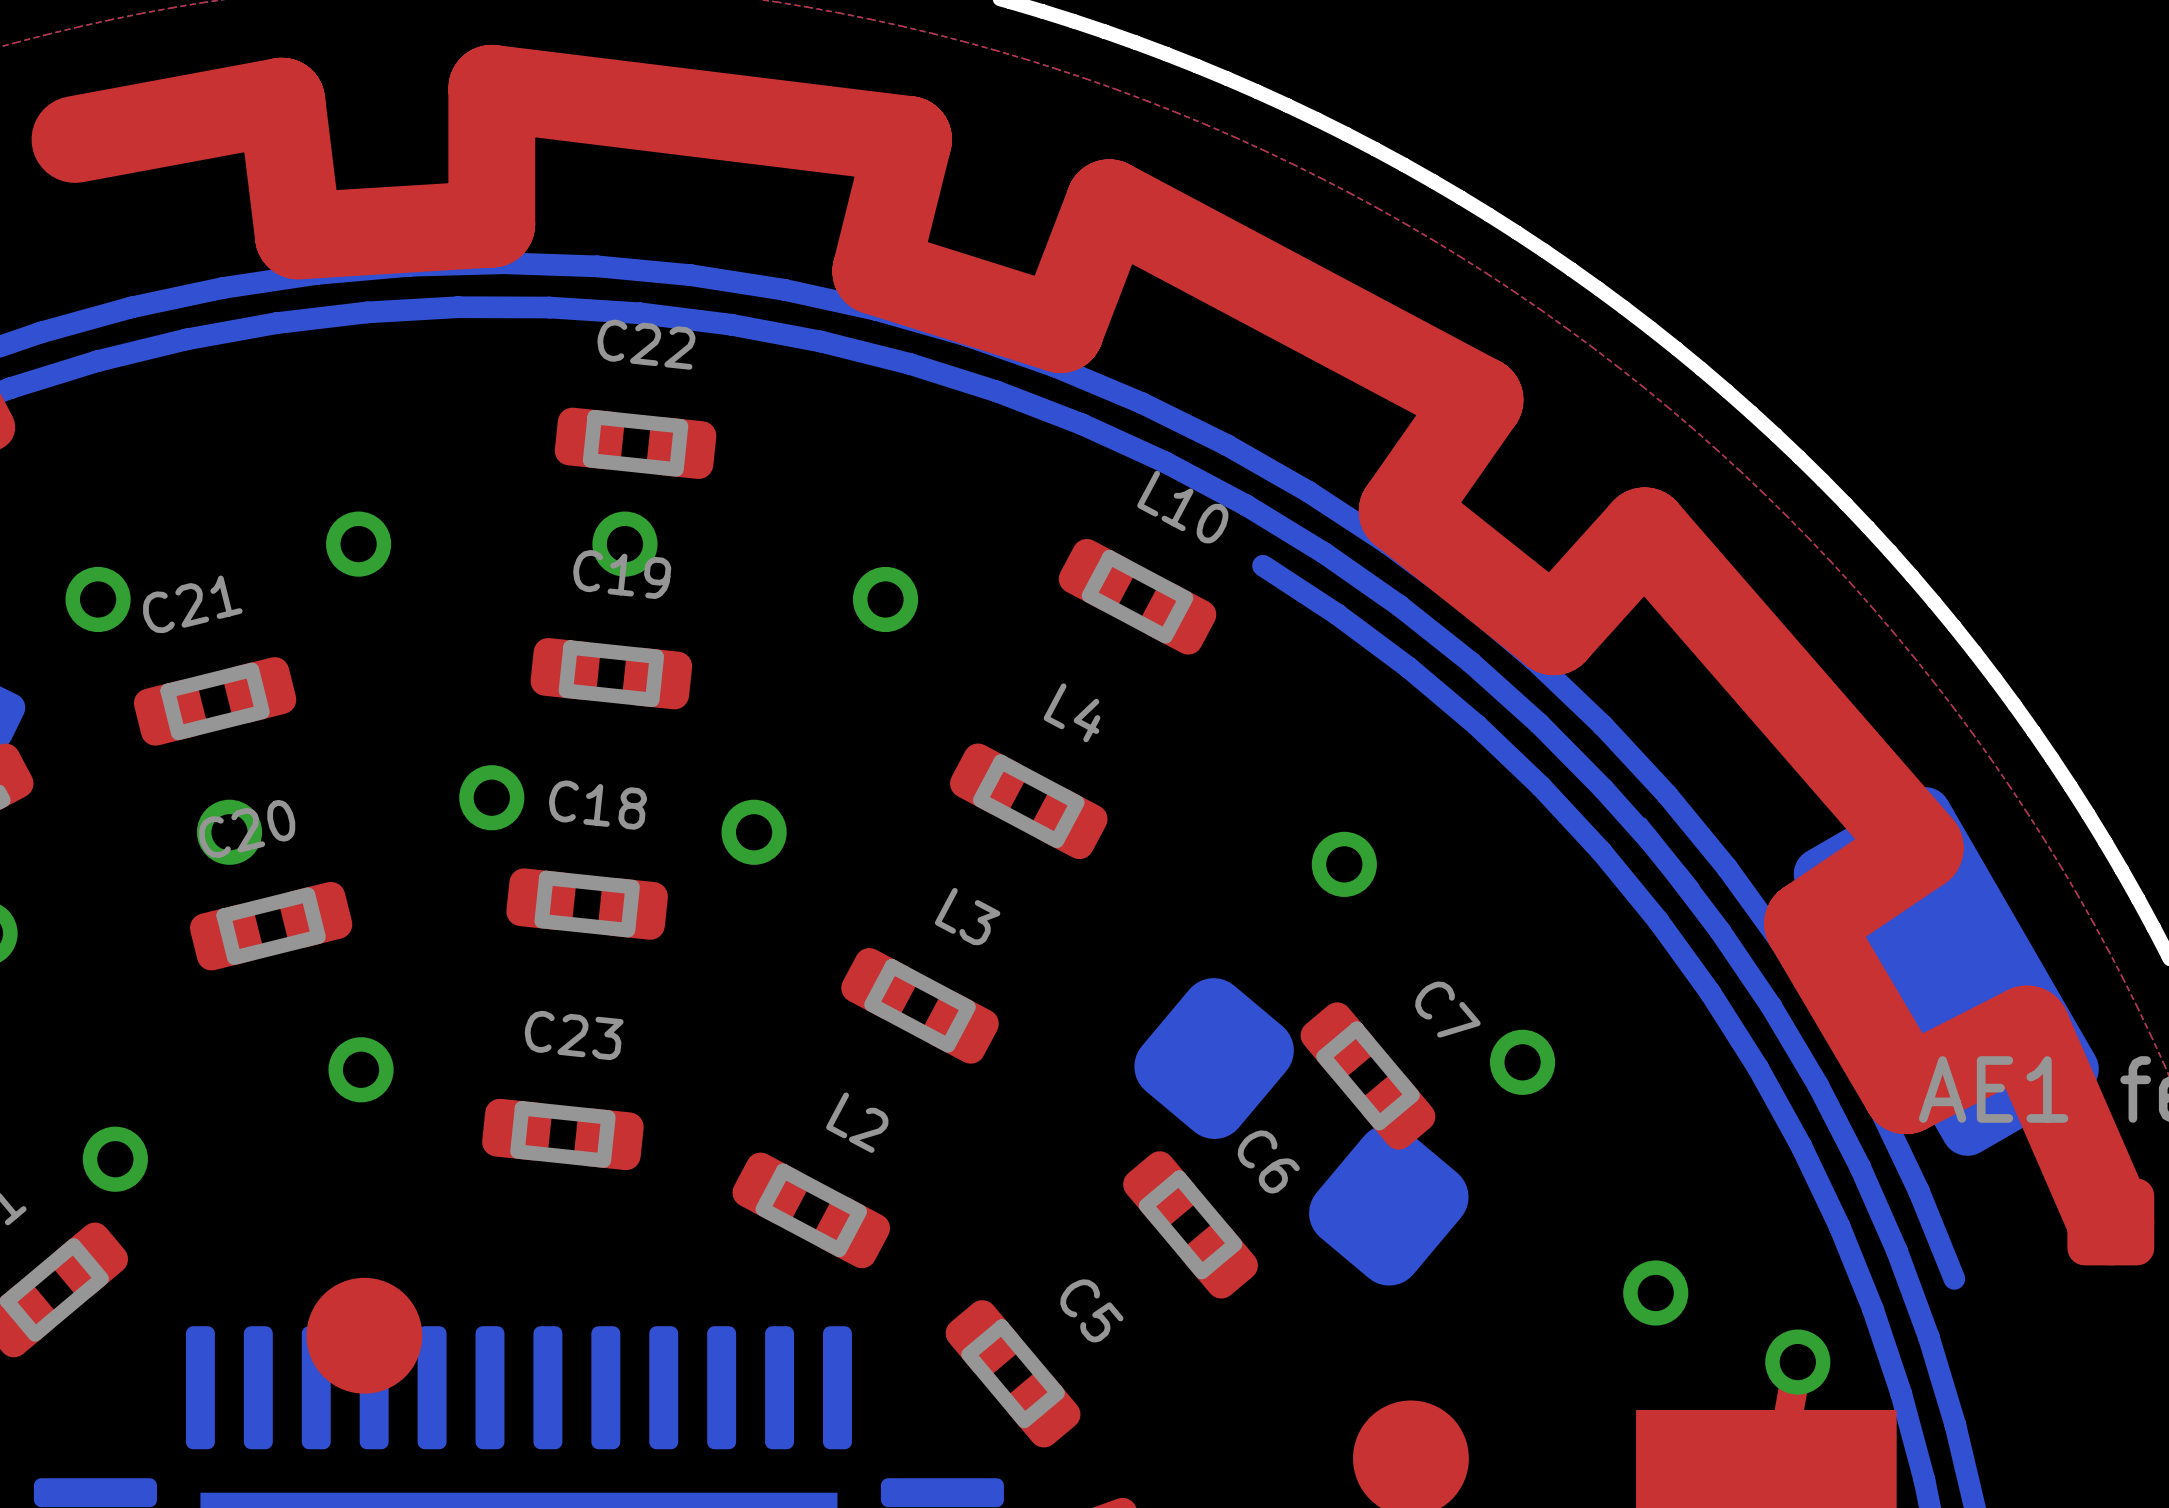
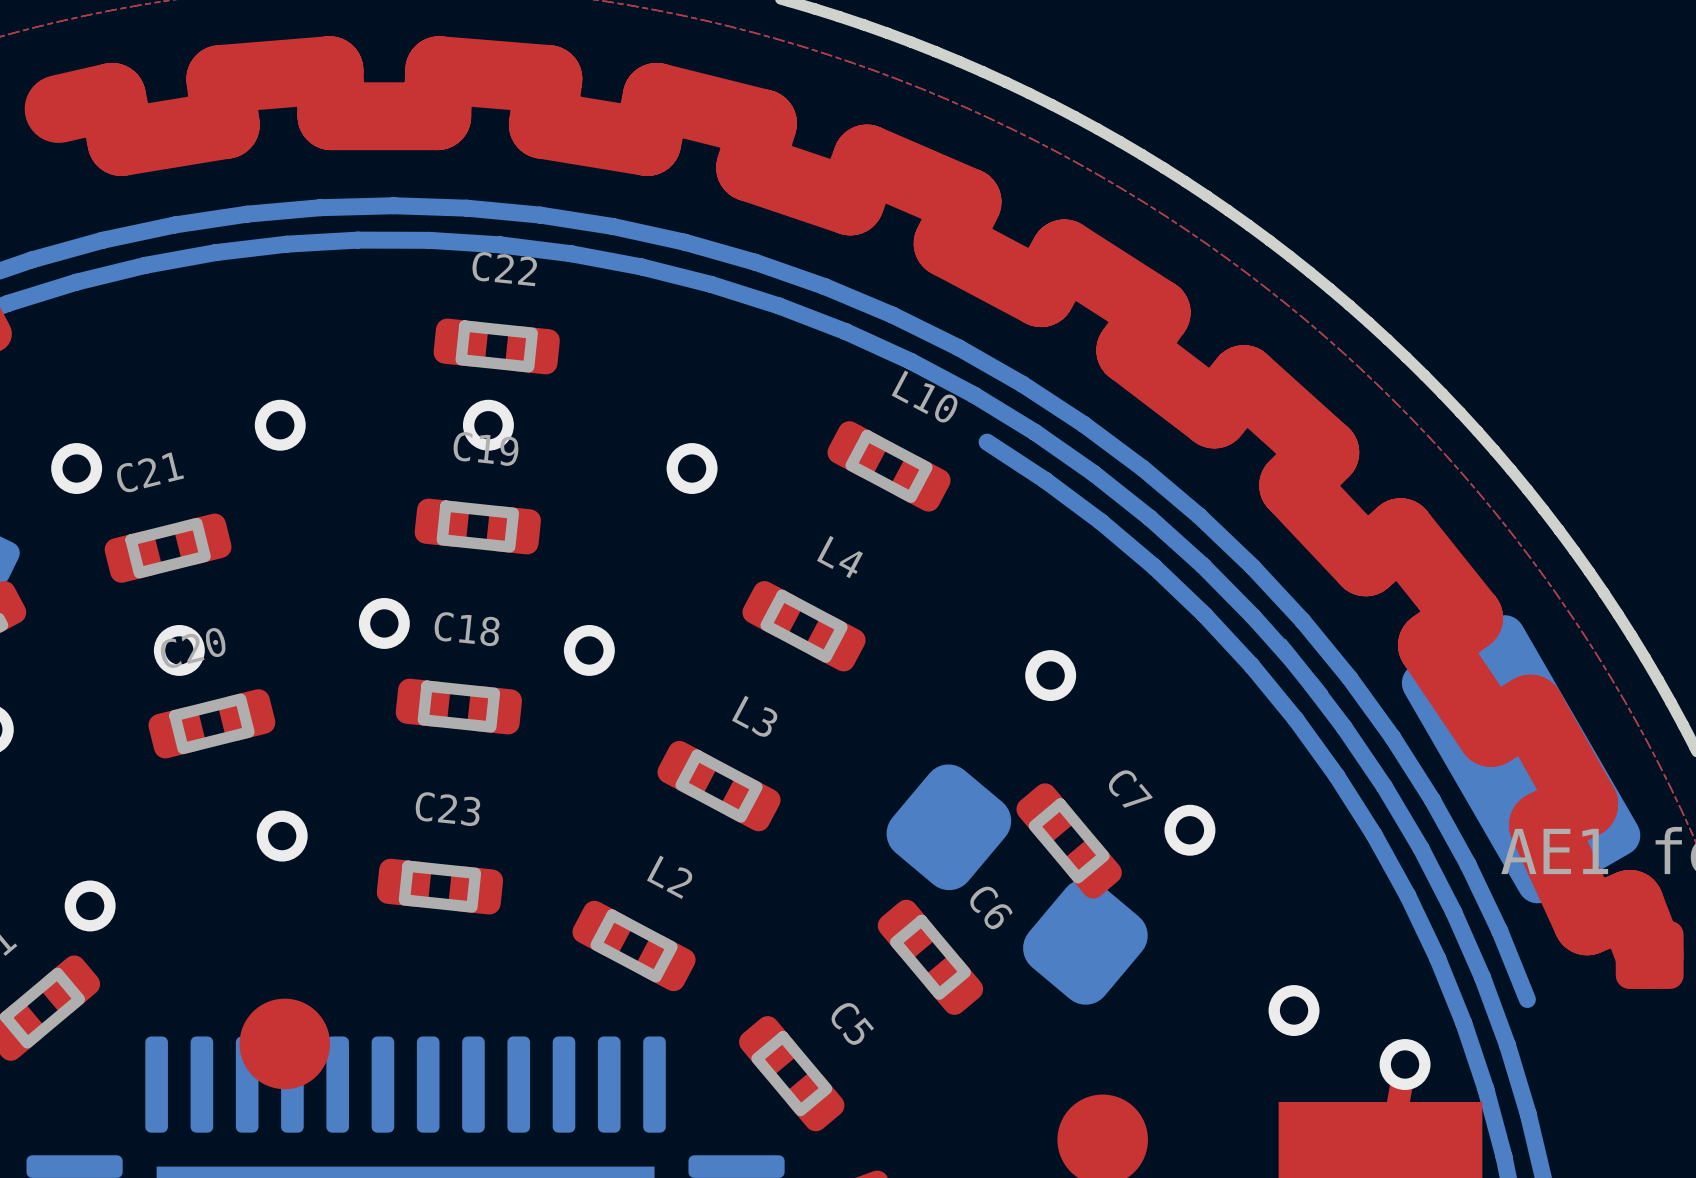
top track: (281, 101) (74, 139) -> (225, 124) (121, 142) (112, 96) (58, 109)
top track: (289, 159) (298, 235) (491, 224) (491, 88) (908, 139) (875, 271) (1060, 329) (1088, 257) -> (220, 79) (329, 70) (331, 116) (437, 116) (439, 70) (548, 79) (542, 124) (647, 142) (656, 96) (763, 123) (750, 167) (850, 201)
top track: (1109, 202) (1480, 399) -> (866, 158) (967, 201) (947, 243) (1041, 293) (1064, 253) (1156, 312)
top track: (1446, 448) (1402, 511) (1553, 631) (1644, 530) (1920, 847) (1807, 923) (1905, 1090) (1974, 1055) -> (1130, 350) (1214, 414) (1243, 379) (1325, 452) (1293, 485) (1365, 562) (1400, 532) (1469, 617) (1431, 645) (1491, 732) (1530, 708) (1584, 804)
top track: (2026, 1029) (2110, 1221) -> (1543, 825) (1587, 921) (1629, 903) (1649, 955)

